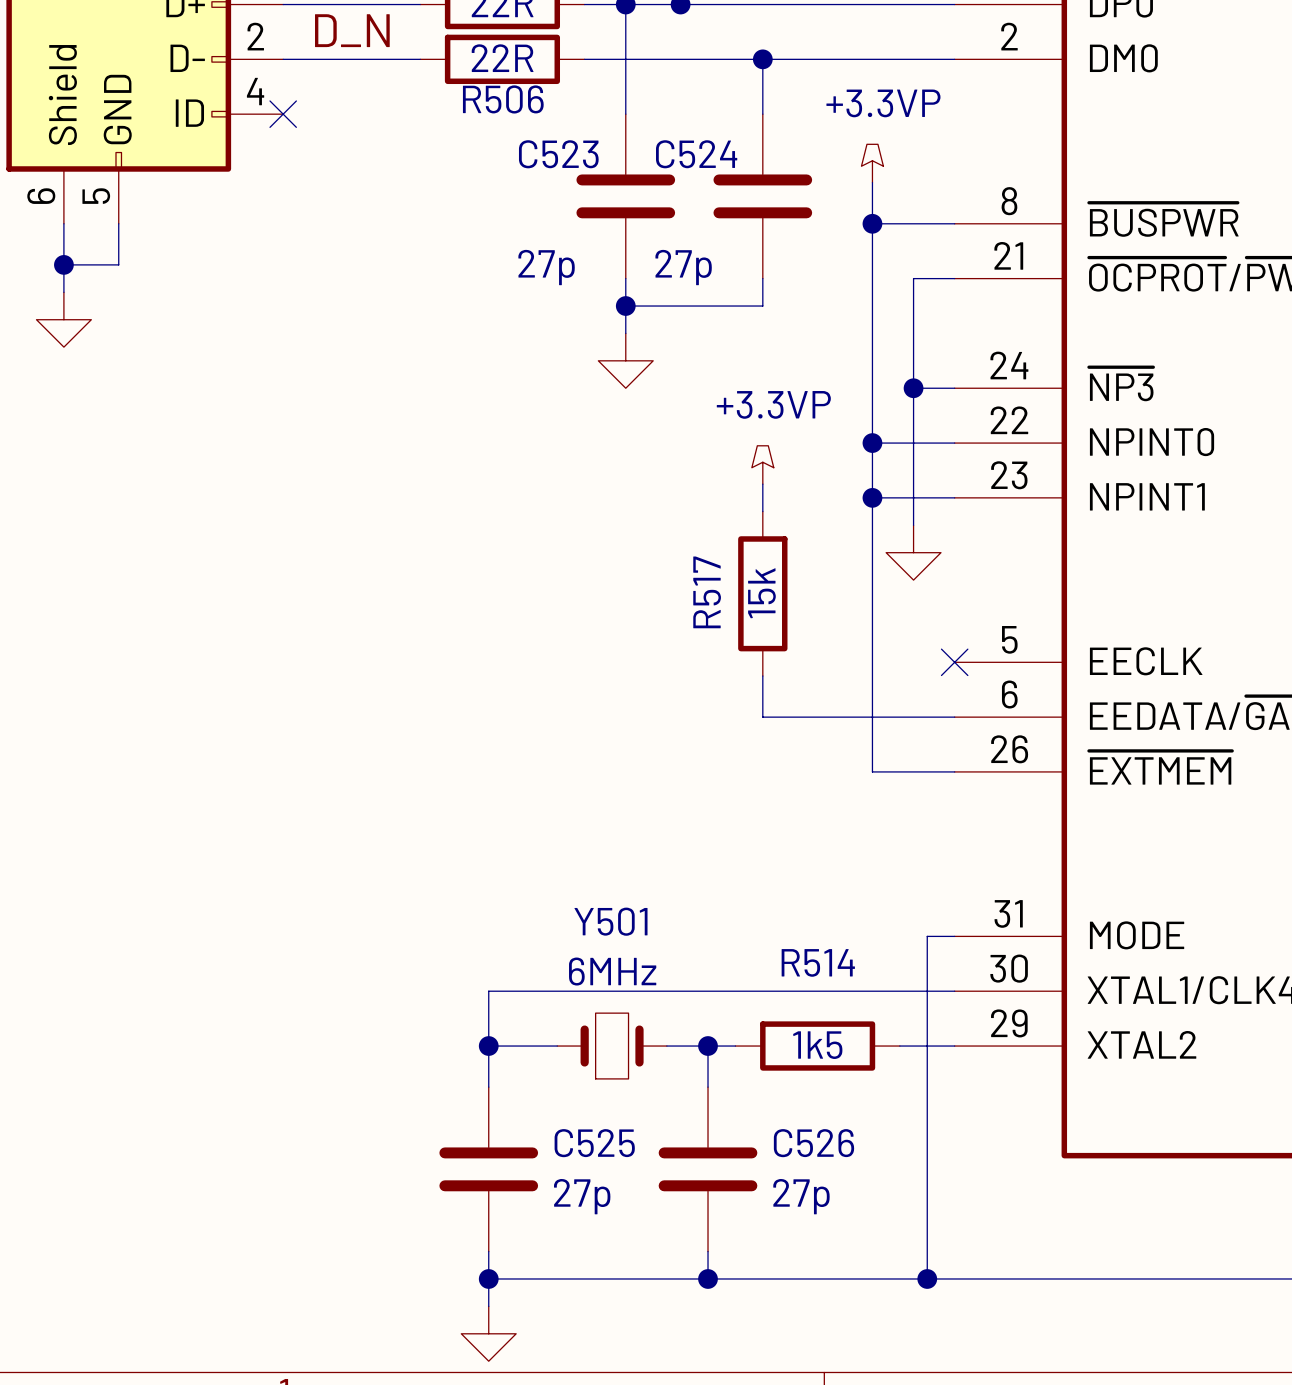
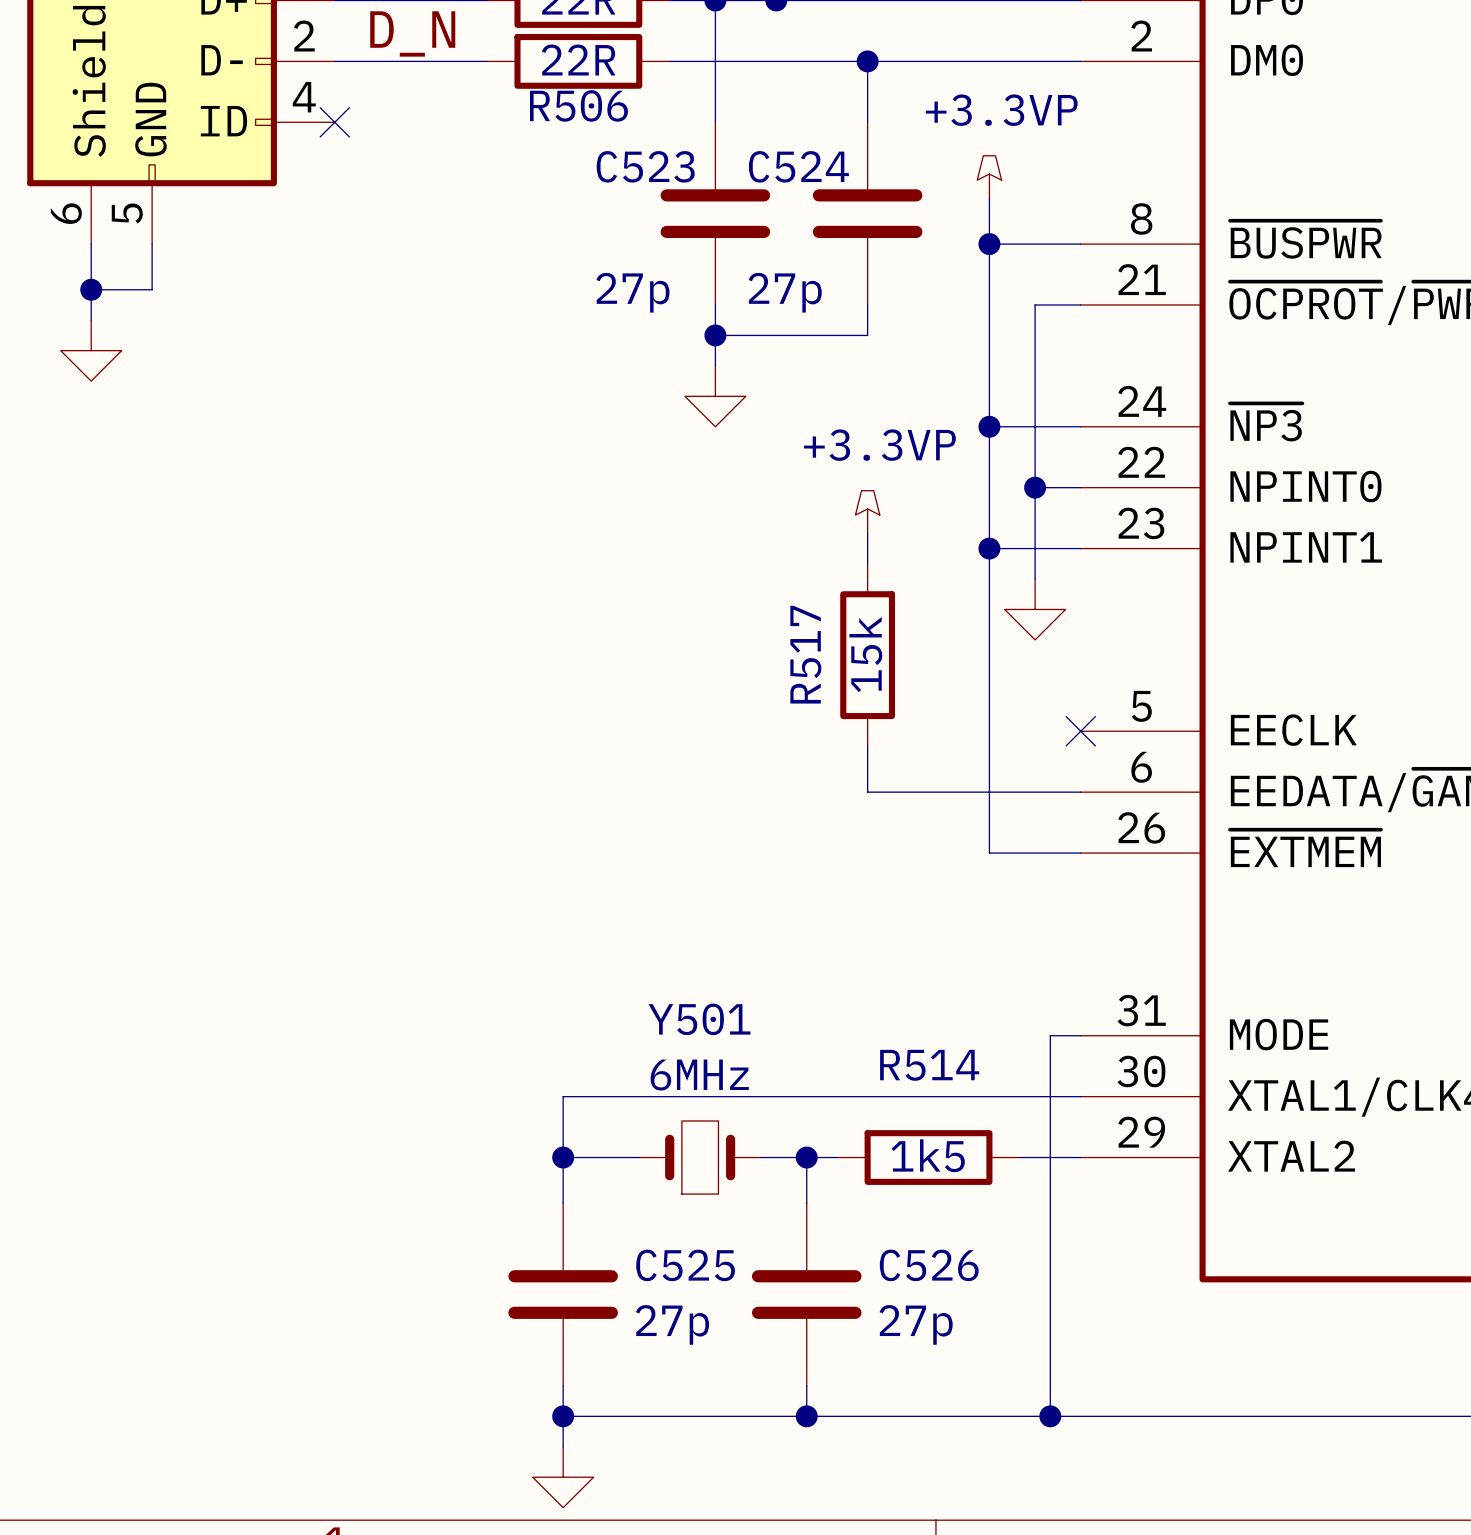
junction: none -> (989, 426)
junction: (913, 388) -> none
wire: (872, 443) (913, 443) -> (989, 426) (1035, 426)
junction: (872, 443) -> none
junction: none -> (1035, 487)

